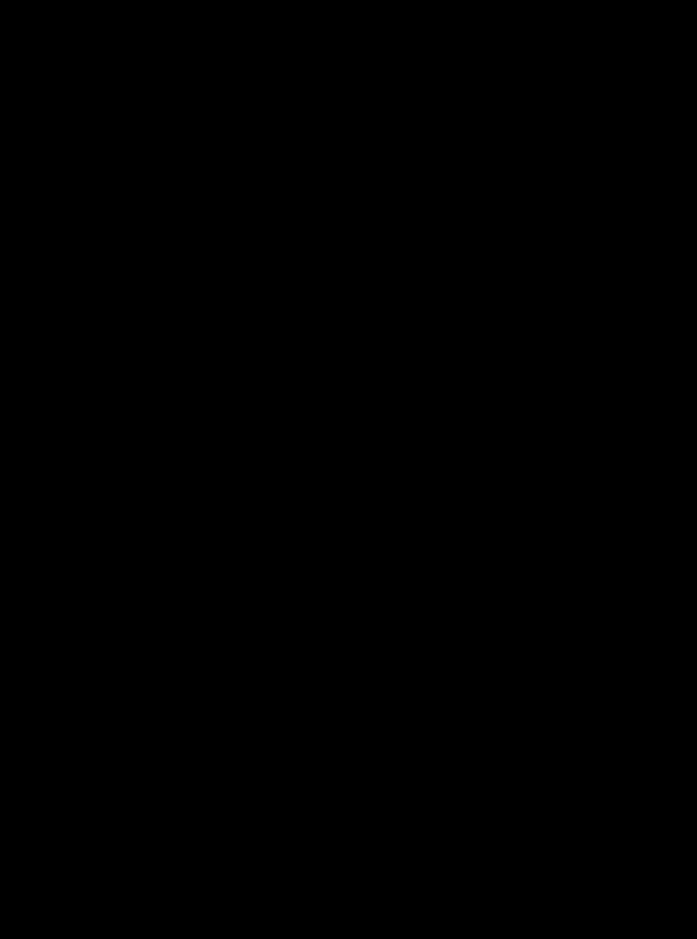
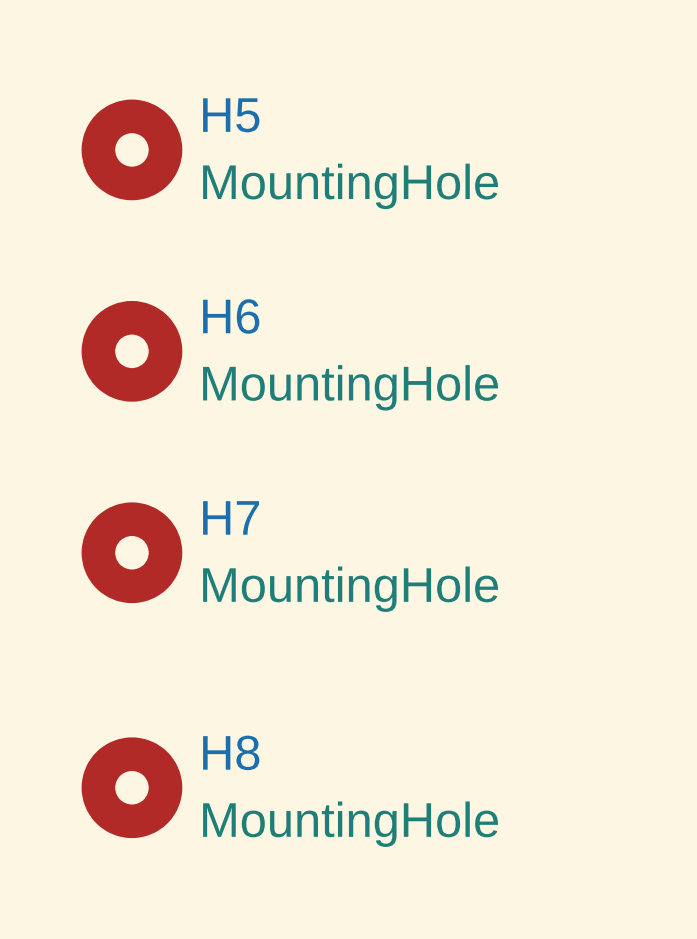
H5: none -> MountingHole (131, 149)
H6: none -> MountingHole (131, 351)
H7: none -> MountingHole (131, 552)
H8: none -> MountingHole (131, 787)

